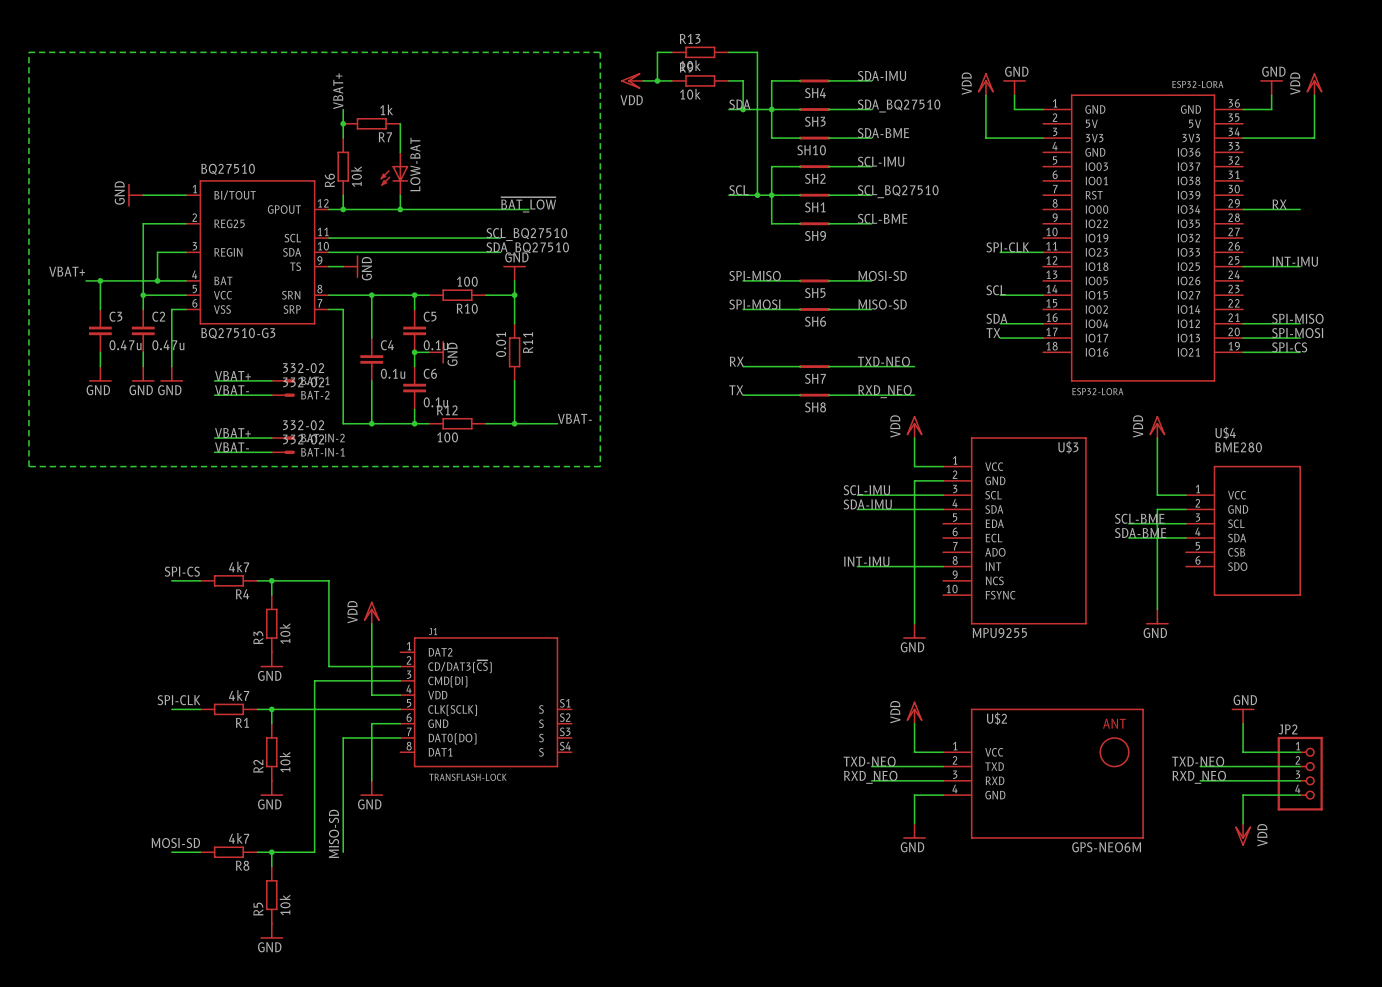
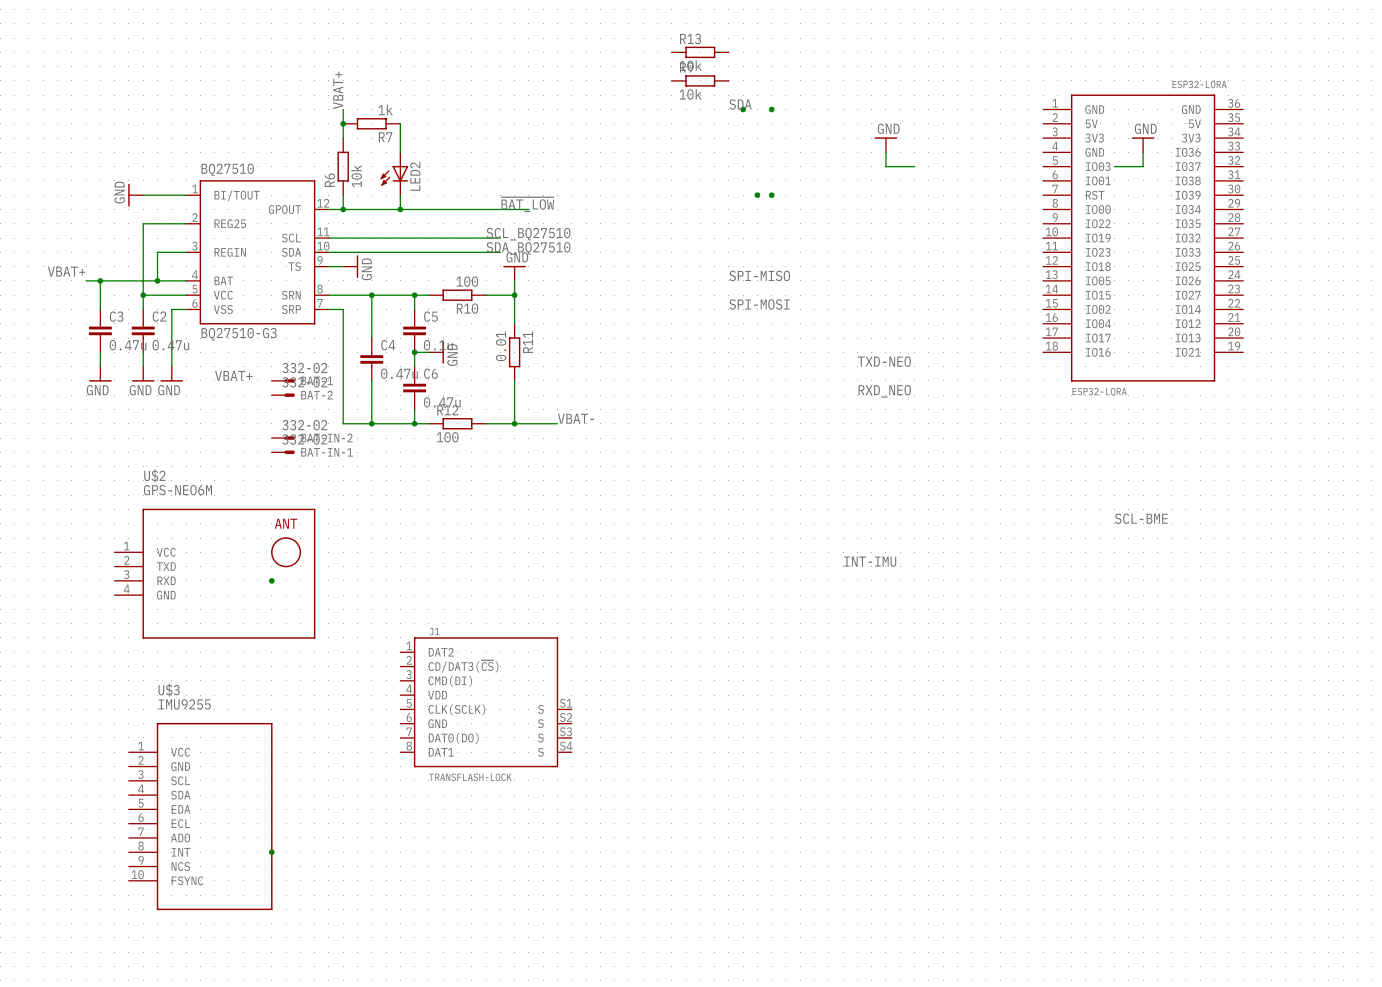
wire: (28, 52) (600, 52) (600, 466) (28, 466) (28, 52) -> none
wire: (671, 52) (657, 52) (657, 80) -> none
wire: (728, 52) (757, 52) (757, 195) -> none
label: SDA-IMU (881, 75) -> none
power symbol: VDD (632, 80) -> none
wire: (643, 80) (671, 80) -> none
junction: (657, 80) -> none
wire: (728, 80) (743, 80) (743, 109) -> none
wire: (800, 80) (771, 80) (771, 138) (800, 138) -> none
SH4: (814, 80) -> none
wire: (828, 80) (871, 80) -> none
power symbol: VDD (985, 84) -> none
power symbol: VDD (1314, 84) -> none
power symbol: GND (1014, 87) -> none
power symbol: GND (1271, 87) -> none
wire: (985, 95) (985, 138) (1043, 138) -> none
wire: (1014, 95) (1014, 109) (1043, 109) -> none
wire: (1271, 95) (1271, 109) (1243, 109) -> none
wire: (1314, 95) (1314, 138) (1243, 138) -> none
label: SDA_BQ27510 (899, 106) -> none
wire: (728, 109) (800, 109) -> none
SH3: (814, 109) -> none
wire: (828, 109) (871, 109) -> none
label: SDA-BME (883, 133) -> none
SH10: (814, 138) -> none
wire: (828, 138) (871, 138) -> none
power symbol: none -> GND (885, 144)
power symbol: none -> GND (1143, 144)
wire: none -> (885, 152) (885, 166) (914, 166)
wire: none -> (1143, 152) (1143, 166) (1114, 166)
label: SCL-IMU (881, 161) -> none
LOW-BAT name: LOW-BAT (415, 164) -> LED2 (415, 176)
wire: (800, 166) (771, 166) (771, 223) (800, 223) -> none
SH2: (814, 166) -> none
wire: (828, 166) (871, 166) -> none
label: SCL (738, 190) -> none
label: SCL_BQ27510 (898, 191) -> none
wire: (728, 195) (800, 195) -> none
SH1: (814, 195) -> none
wire: (828, 195) (871, 195) -> none
label: RX (1279, 204) -> none
wire: (1243, 209) (1300, 209) -> none
label: SCL-BME (882, 218) -> none
SH9: (814, 223) -> none
wire: (828, 223) (871, 223) -> none
label: SPI-CLK (1007, 247) -> none
wire: (1000, 252) (1043, 252) -> none
label: INT-IMU (1295, 261) -> none
wire: (1243, 266) (1300, 266) -> none
label: MOSI-SD (882, 275) -> none
wire: (743, 280) (800, 280) -> none
SH5: (814, 280) -> none
wire: (828, 280) (871, 280) -> none
label: SCL (996, 290) -> none
wire: (1000, 295) (1043, 295) -> none
label: MISO-SD (882, 304) -> none
wire: (743, 309) (800, 309) -> none
SH6: (814, 309) -> none
wire: (828, 309) (871, 309) -> none
label: SDA (996, 318) -> none
label: SPI-MISO (1297, 318) -> none
wire: (1000, 323) (1043, 323) -> none
wire: (1243, 323) (1300, 323) -> none
label: TX (993, 333) -> none
label: SPI-MOSI (1297, 333) -> none
wire: (1000, 338) (1043, 338) -> none
wire: (1243, 338) (1300, 338) -> none
label: SPI-CS (1289, 347) -> none
wire: (1243, 352) (1300, 352) -> none
label: RX (736, 361) -> none
wire: (743, 366) (800, 366) -> none
SH7: (814, 366) -> none
wire: (828, 366) (914, 366) -> none
C4 value: 0.1u (393, 373) -> 0.47u (399, 373)
wire: (214, 380) (271, 380) -> none
label: VBAT- (232, 390) -> none
label: TX (736, 390) -> none
wire: (214, 395) (271, 395) -> none
wire: (743, 395) (800, 395) -> none
SH8: (814, 395) -> none
wire: (828, 395) (914, 395) -> none
C6 value: 0.1u (435, 402) -> 0.47u (442, 402)
power symbol: VDD (914, 426) -> none
power symbol: VDD (1157, 426) -> none
label: VBAT+ (232, 433) -> none
wire: (214, 438) (271, 438) -> none
wire: (914, 438) (914, 466) (943, 466) -> none
wire: (1157, 438) (1157, 495) (1185, 495) -> none
label: VBAT- (232, 447) -> none
U$3 name position: U$3 (1068, 447) -> U$3 (169, 690)
wire: (214, 452) (271, 452) -> none
wire: (943, 480) (914, 480) (914, 623) -> none
label: SCL-IMU (866, 490) -> none
wire: (857, 495) (943, 495) -> none
label: SDA-IMU (867, 504) -> none
wire: (857, 509) (943, 509) -> none
wire: (1185, 509) (1157, 509) (1157, 609) -> none
wire: (1128, 523) (1185, 523) -> none
U$3 position: (1014, 530) -> (200, 816)
U$4: BME280 (1243, 530) -> none
label: SDA-BME (1140, 533) -> none
wire: (1128, 538) (1185, 538) -> none
wire: (857, 566) (943, 566) -> none
label: SPI-CS (182, 571) -> none
wire: (171, 580) (200, 580) -> none
R4: 4k7 (228, 580) -> none
wire: (257, 580) (328, 580) (328, 666) (400, 666) -> none
wire: (271, 580) (271, 595) -> none
power symbol: VDD (371, 612) -> none
power symbol: GND (1157, 616) -> none
R3: 10k (271, 623) -> none
wire: (371, 623) (371, 695) (400, 695) -> none
power symbol: GND (914, 631) -> none
U$3 value: MPU9255 (999, 633) -> IMU9255 (184, 704)
power symbol: GND (271, 659) -> none
wire: (400, 680) (314, 680) (314, 852) (257, 852) -> none
label: SPI-CLK (178, 700) -> none
wire: (171, 709) (200, 709) -> none
R1: 4k7 (228, 709) -> none
wire: (257, 709) (400, 709) -> none
wire: (271, 709) (271, 723) -> none
junction: (271, 709) -> none
power symbol: VDD (914, 712) -> none
power symbol: GND (1243, 716) -> none
U$2 name position: U$2 (996, 718) -> U$2 (154, 475)
wire: (400, 723) (371, 723) (371, 780) -> none
wire: (914, 723) (914, 752) (943, 752) -> none
wire: (1243, 723) (1243, 752) (1300, 752) -> none
wire: (400, 737) (343, 737) (343, 852) -> none
R2: 10k (271, 752) -> none
label: TXD-NEO (869, 761) -> none
label: TXD-NEO (1198, 761) -> none
wire: (871, 766) (943, 766) -> none
wire: (1200, 766) (1300, 766) -> none
U$2 position: (1043, 773) -> (215, 573)
JP2: (1300, 773) -> none
label: RXD_NEO (870, 777) -> none
label: RXD_NEO (1199, 777) -> none
wire: (871, 780) (943, 780) -> none
wire: (1200, 780) (1300, 780) -> none
power symbol: GND (271, 788) -> none
power symbol: GND (371, 788) -> none
wire: (943, 795) (914, 795) (914, 823) -> none
wire: (1300, 795) (1243, 795) (1243, 823) -> none
power symbol: GND (914, 831) -> none
label: MISO-SD (333, 833) -> none
power symbol: VDD (1243, 834) -> none
label: MOSI-SD (175, 843) -> none
U$2 value position: GPS-NEO6M (1106, 847) -> GPS-NEO6M (177, 490)
wire: (171, 852) (200, 852) -> none
R8: 4k7 (228, 852) -> none
R5: 10k (271, 895) -> none
power symbol: GND (271, 931) -> none

